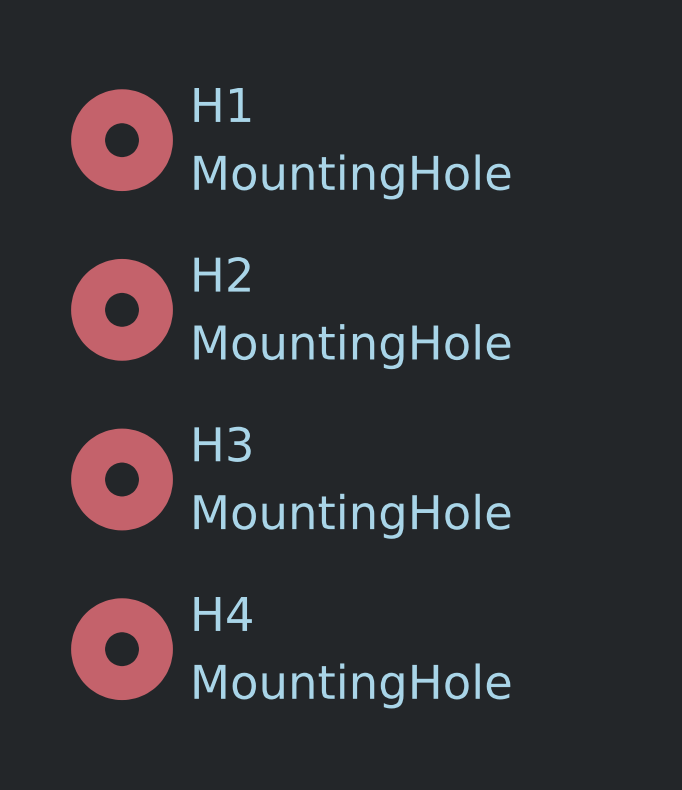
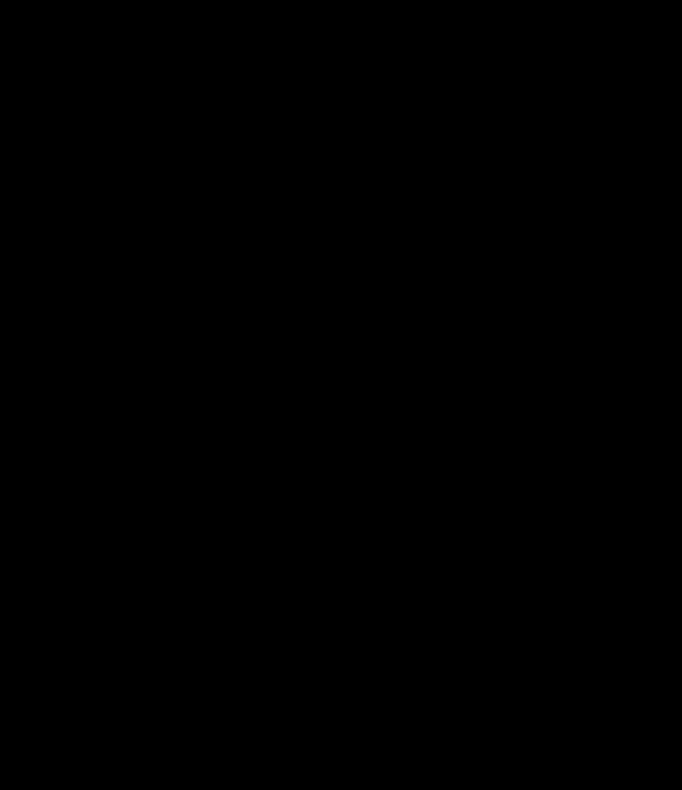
H1: MountingHole (122, 140) -> none
H2: MountingHole (122, 309) -> none
H3: MountingHole (122, 479) -> none
H4: MountingHole (122, 649) -> none

